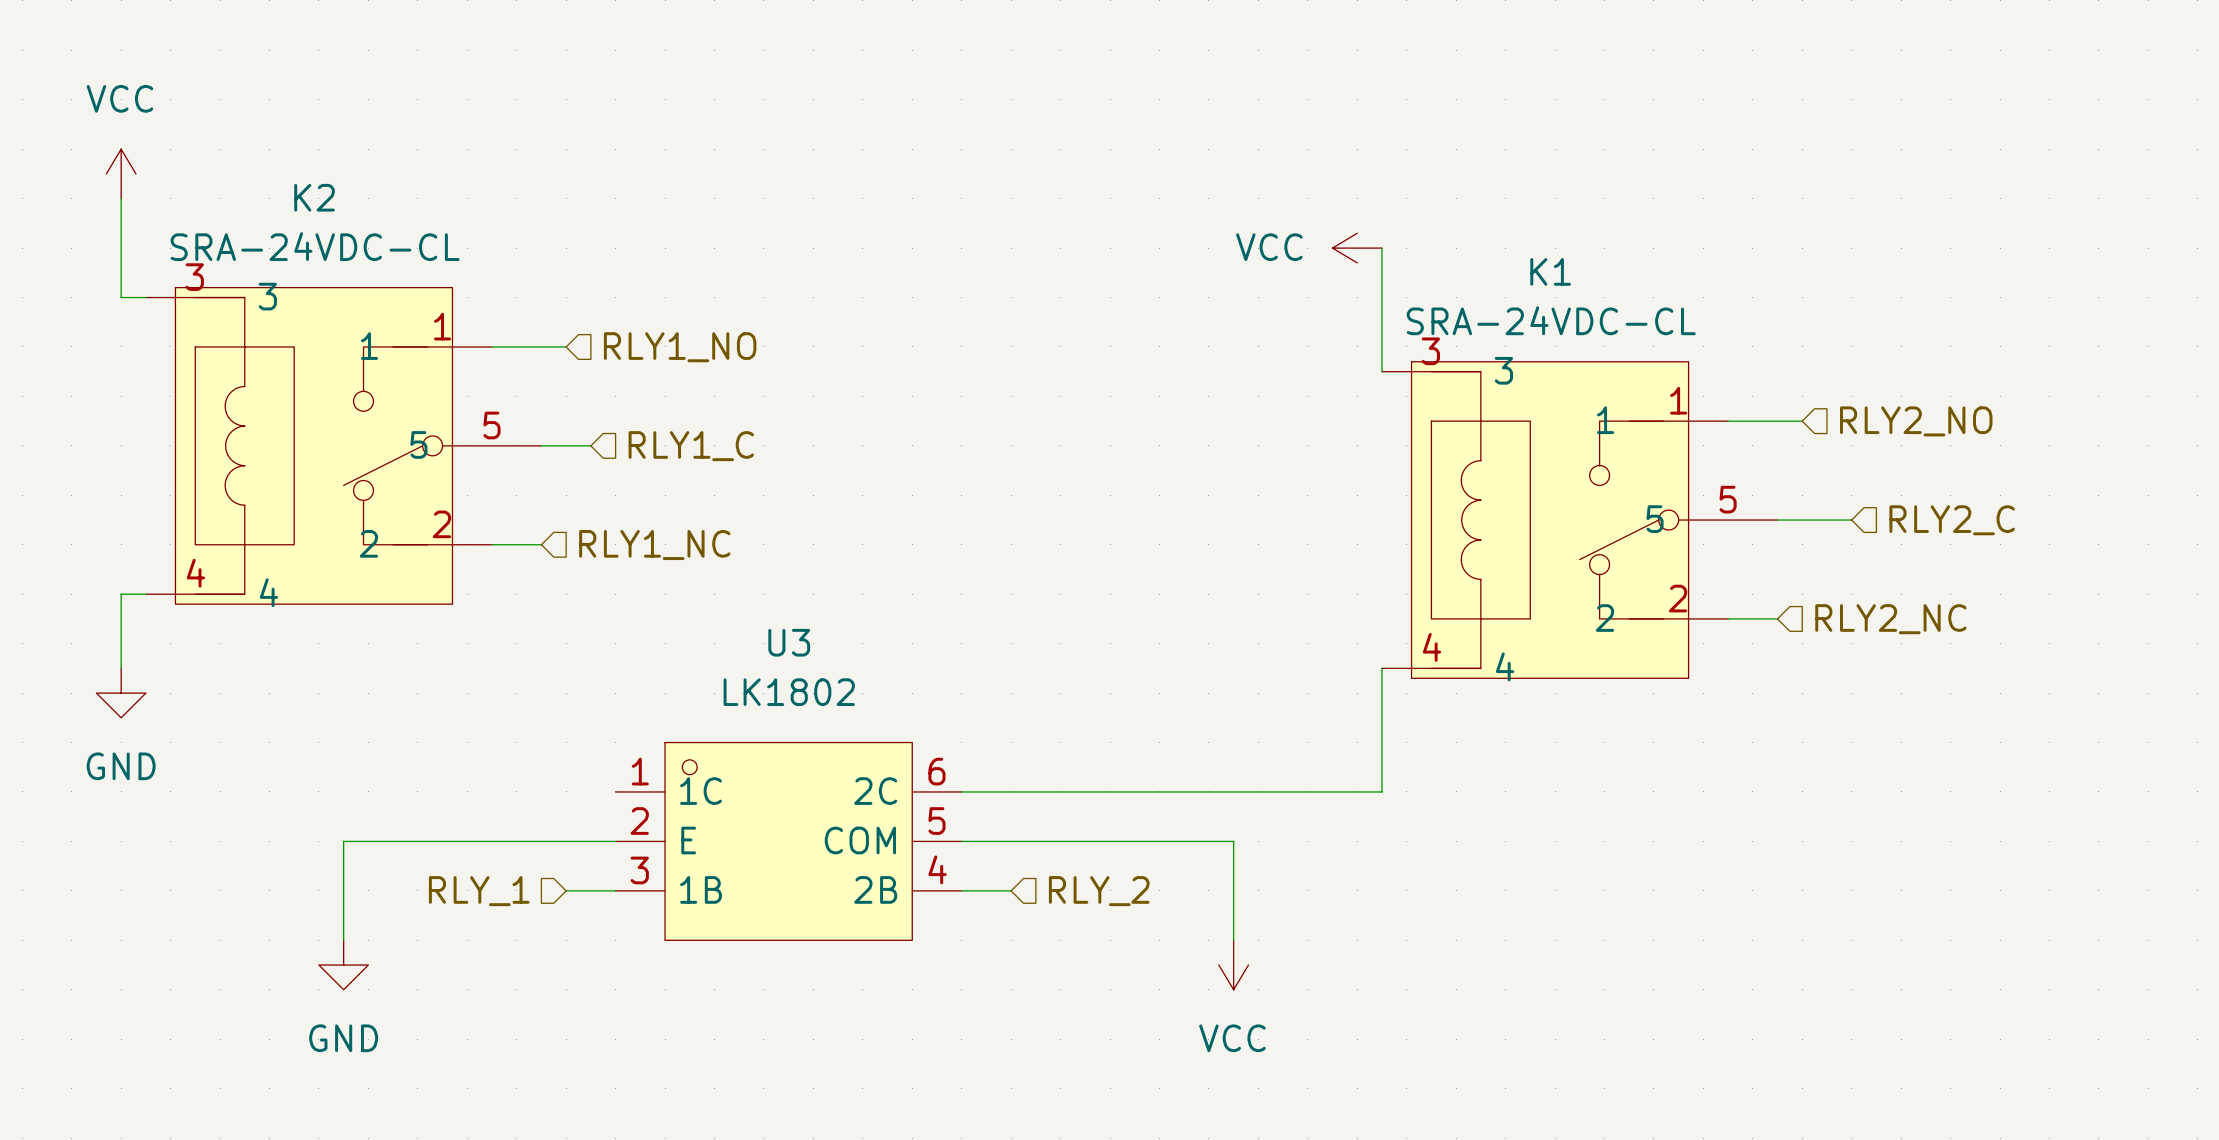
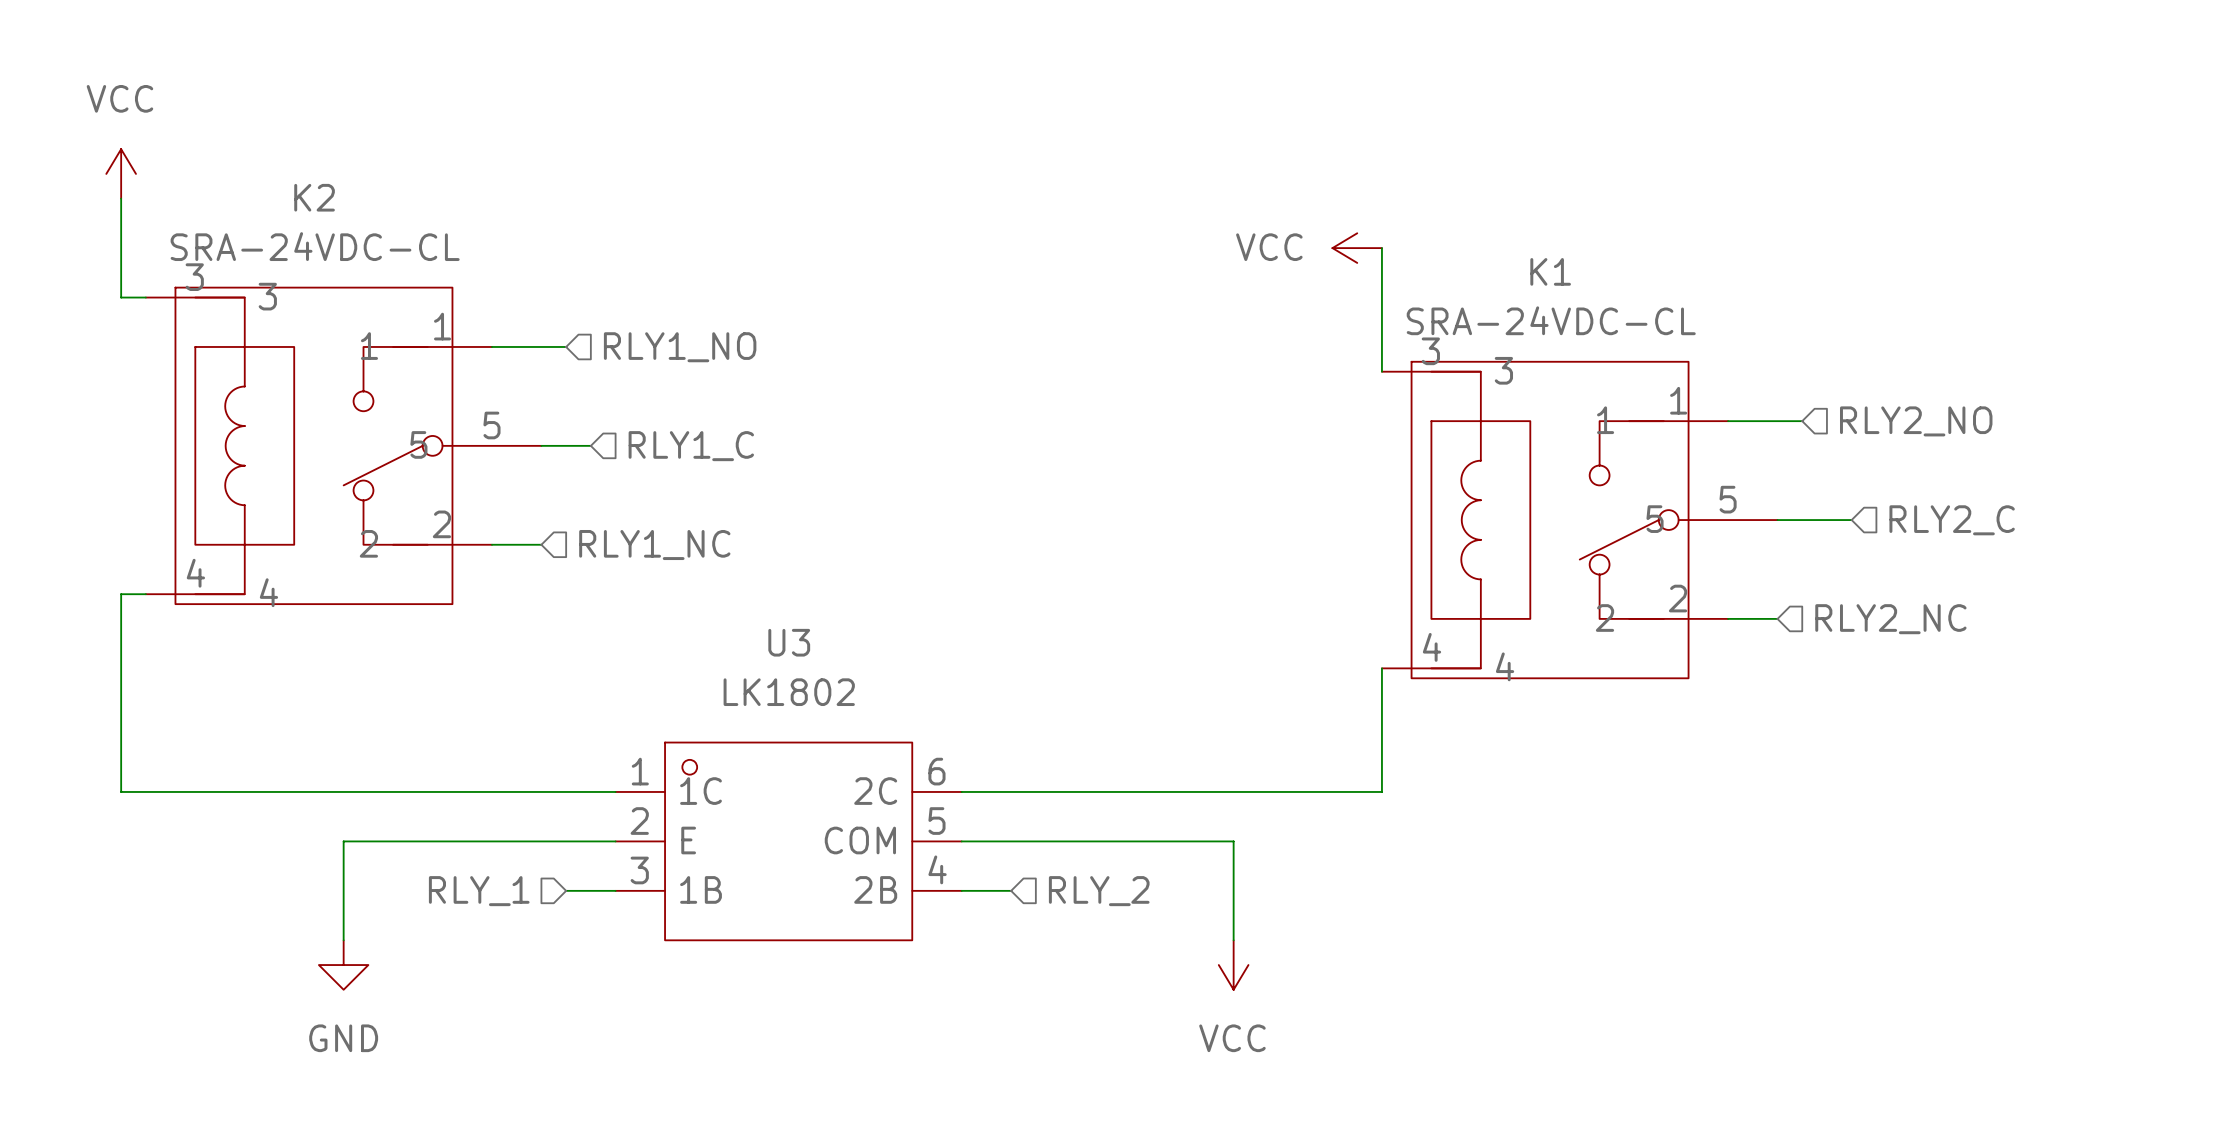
wire: none -> (121, 668) (121, 791) (615, 791)
power symbol: GND (121, 693) -> none

